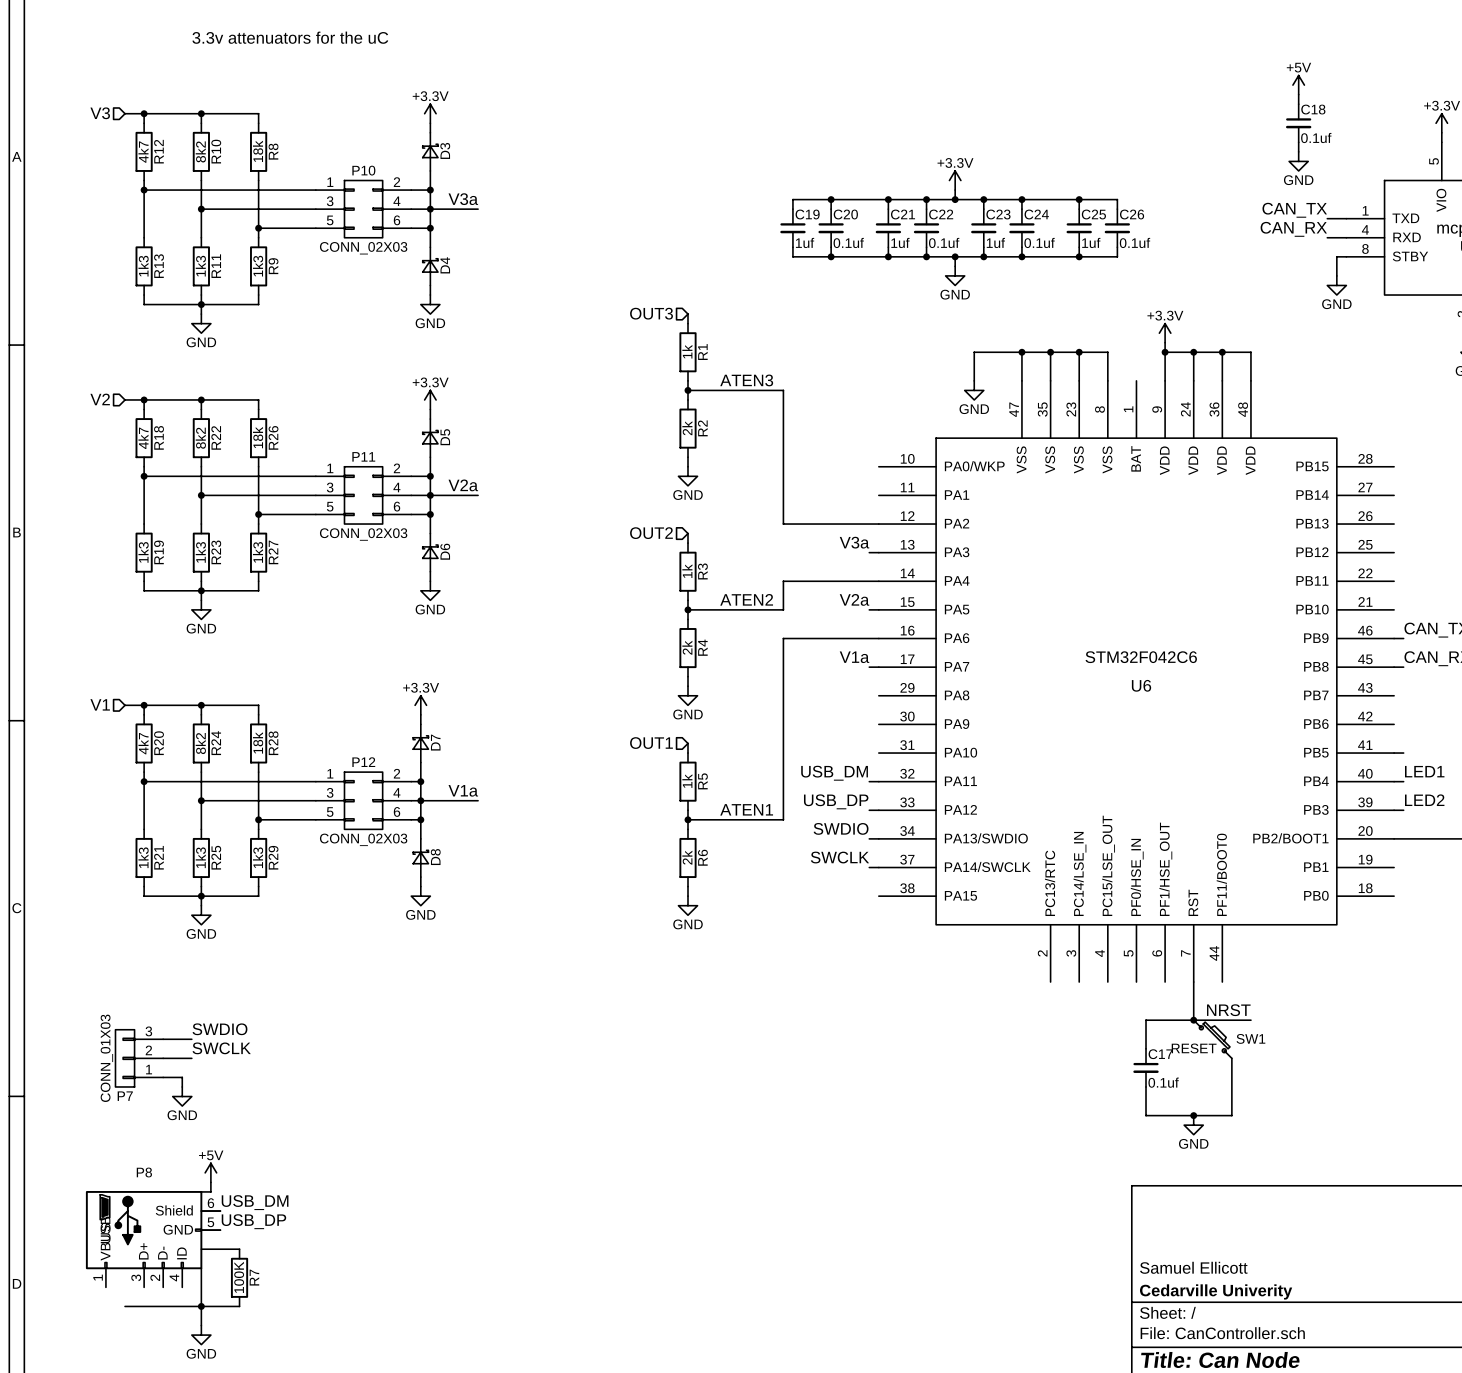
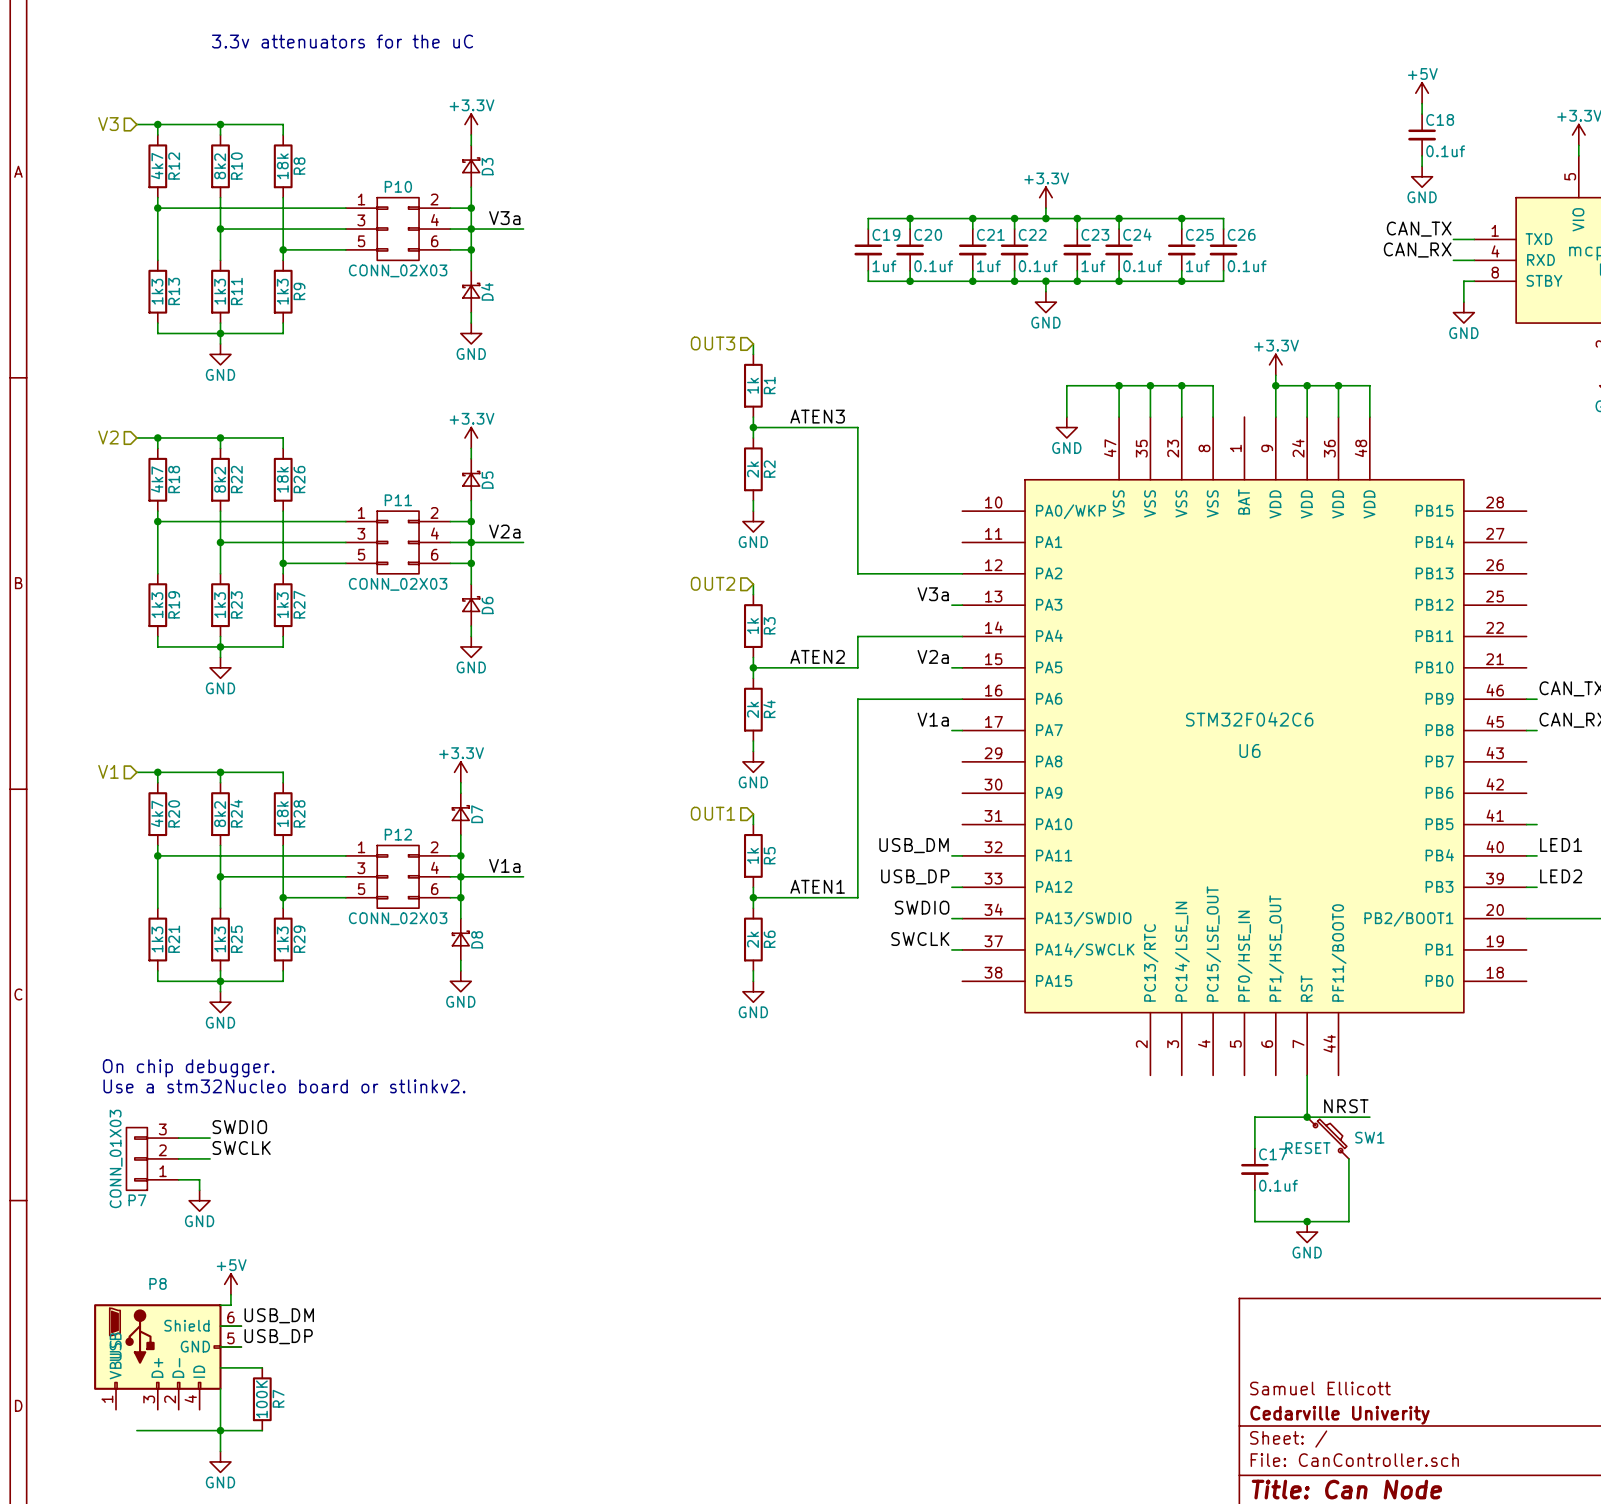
text: none -> On chip debugger. (188, 1068)
text: none -> Use a stm32Nucleo board or stlinkv2. (284, 1086)

